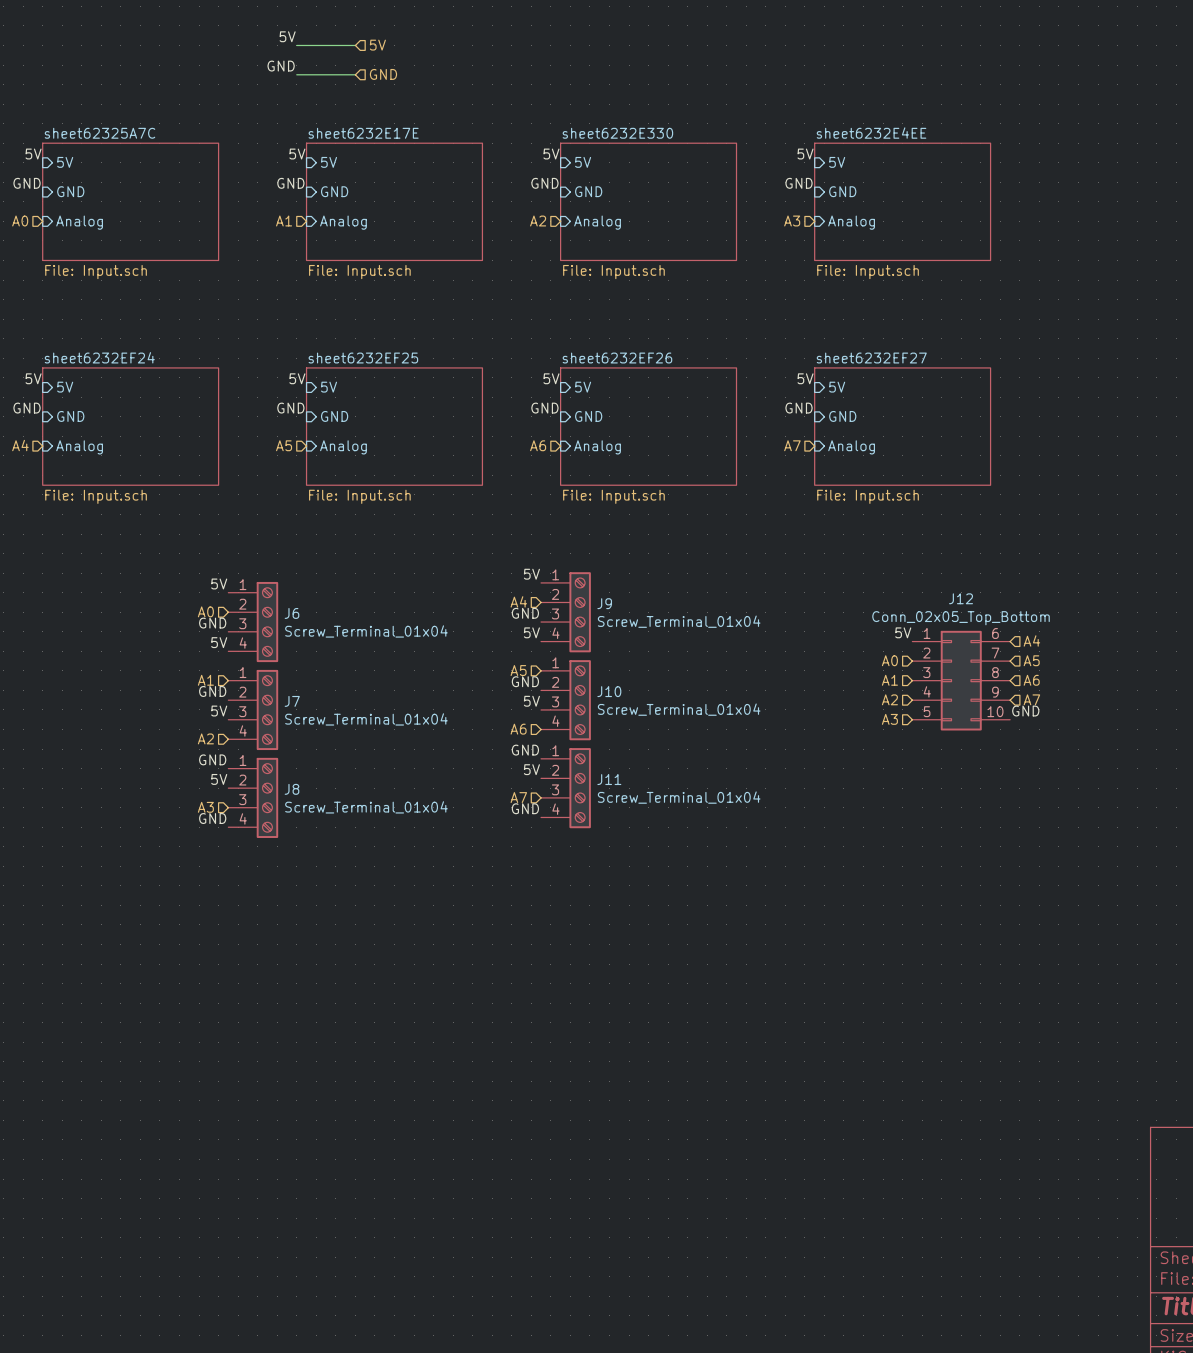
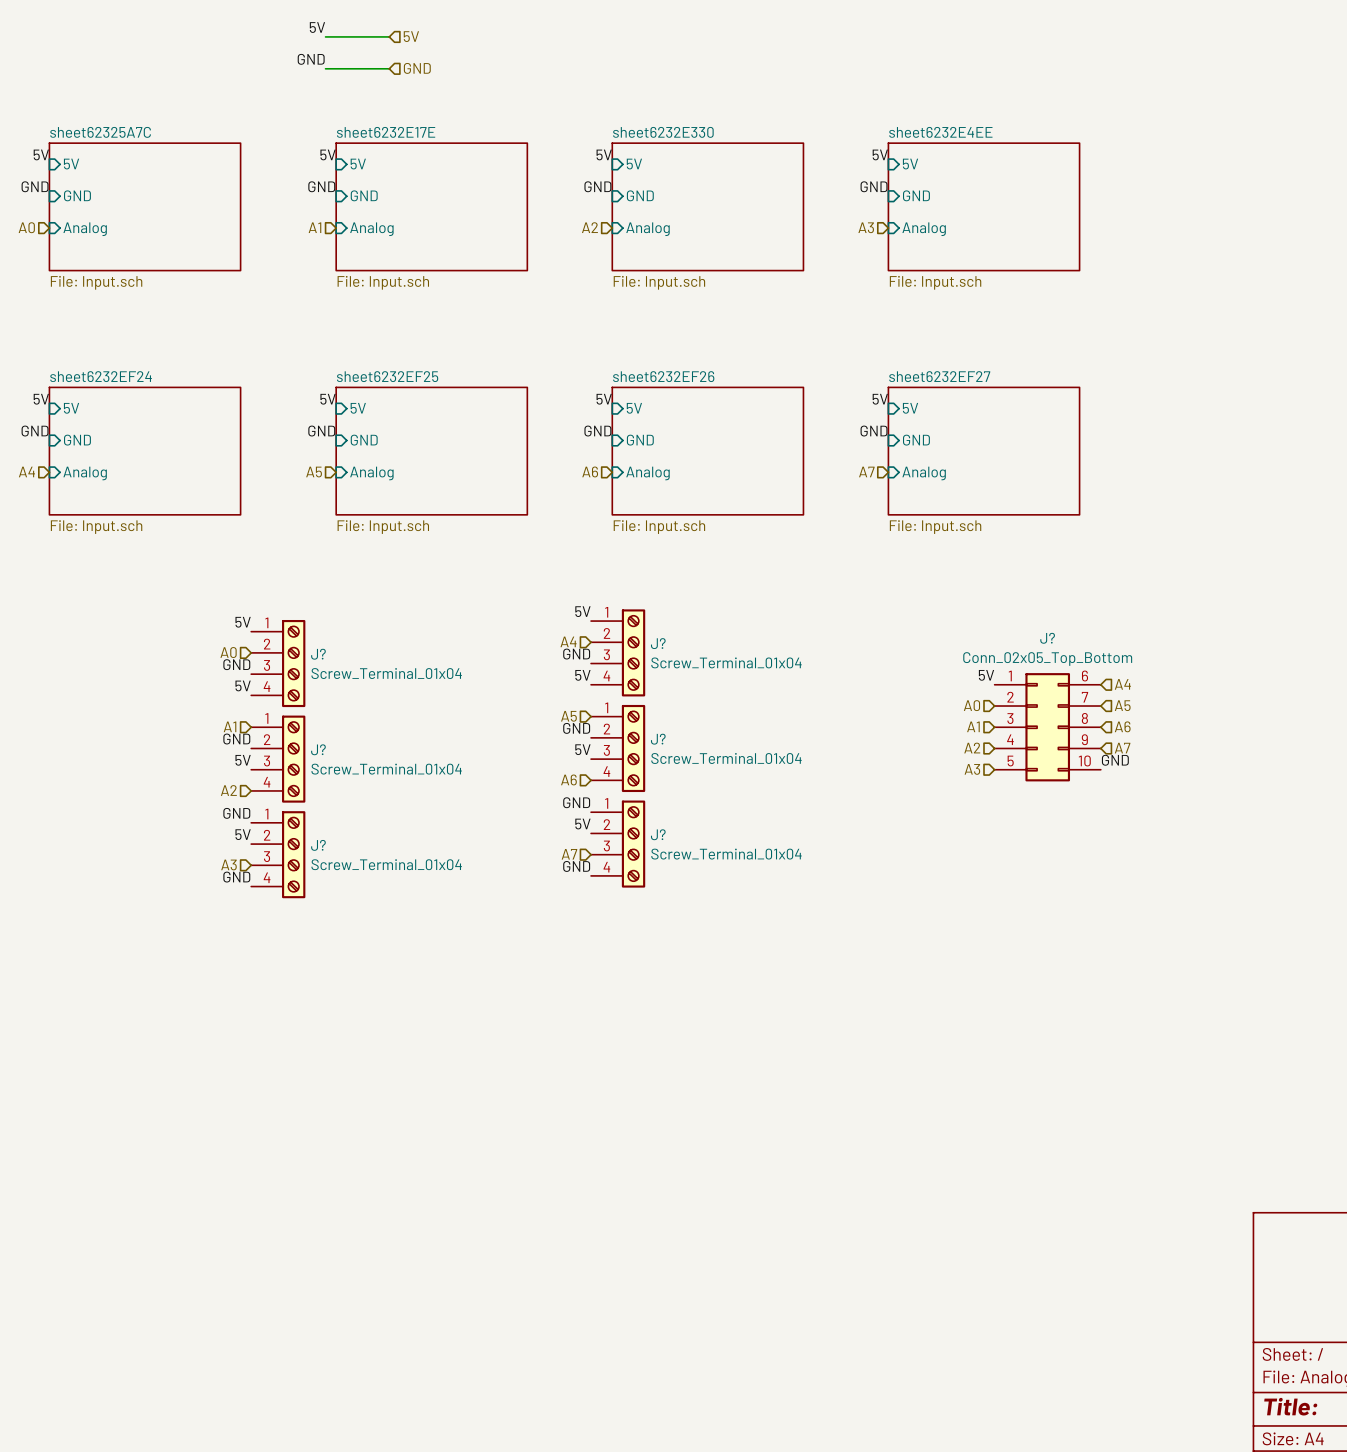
J12 name: J12 (961, 598) -> J? (1047, 638)
J9 name: J9 (604, 603) -> J? (658, 643)
J6 name: J6 (292, 613) -> J? (318, 654)
J10 name: J10 (609, 691) -> J? (658, 739)
J7 name: J7 (292, 701) -> J? (318, 749)
J11 name: J11 (609, 779) -> J? (658, 834)
J8 name: J8 (292, 789) -> J? (318, 845)

